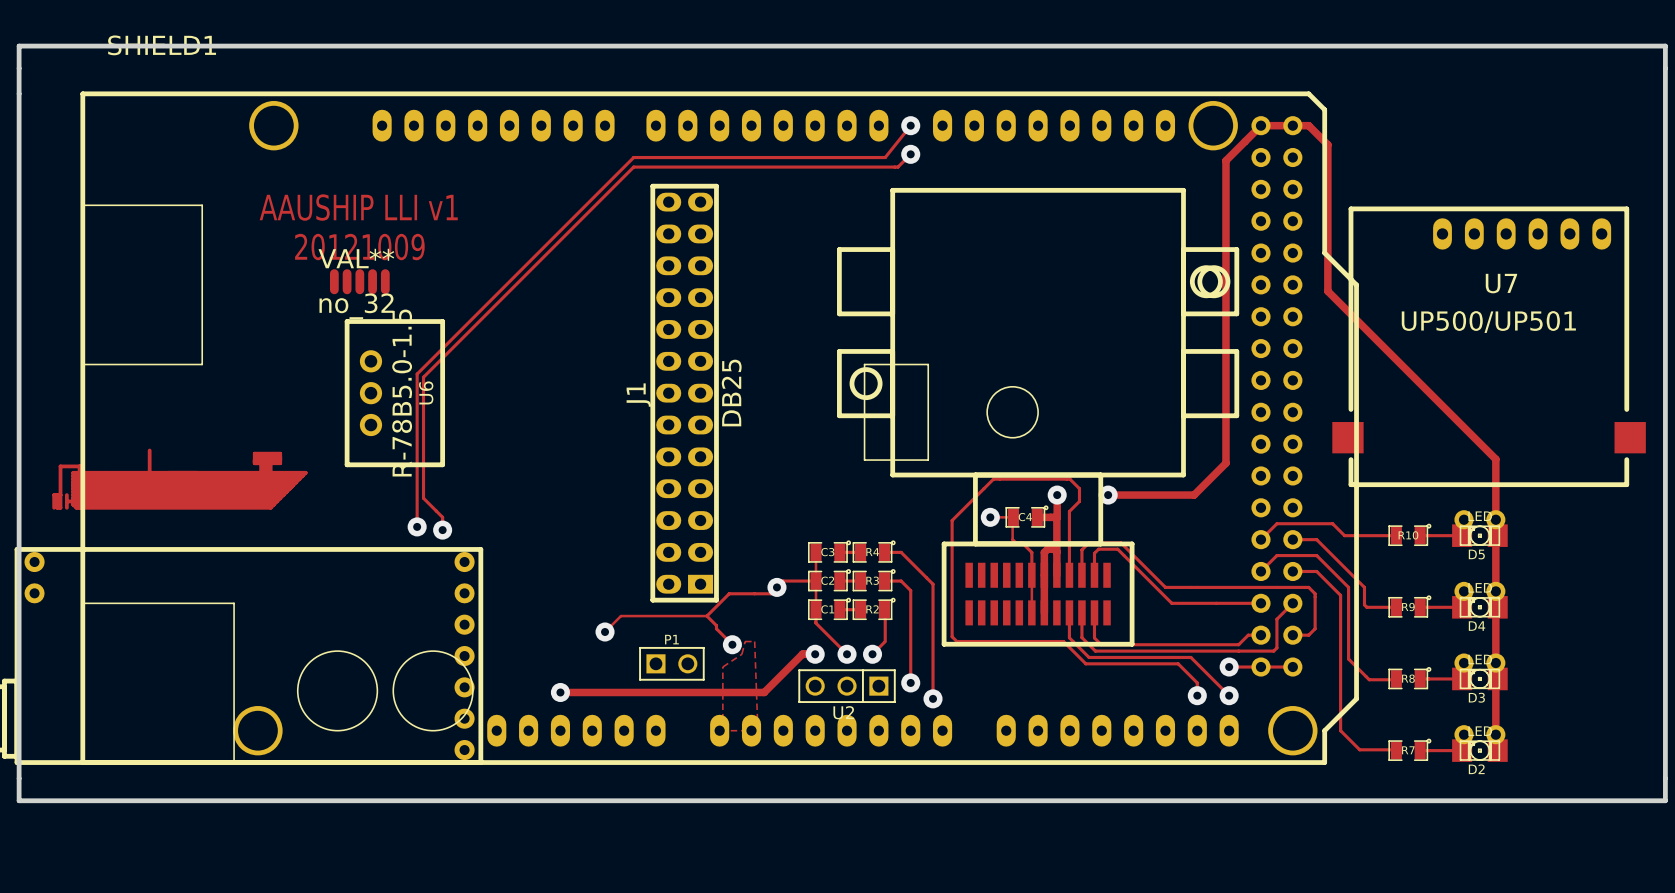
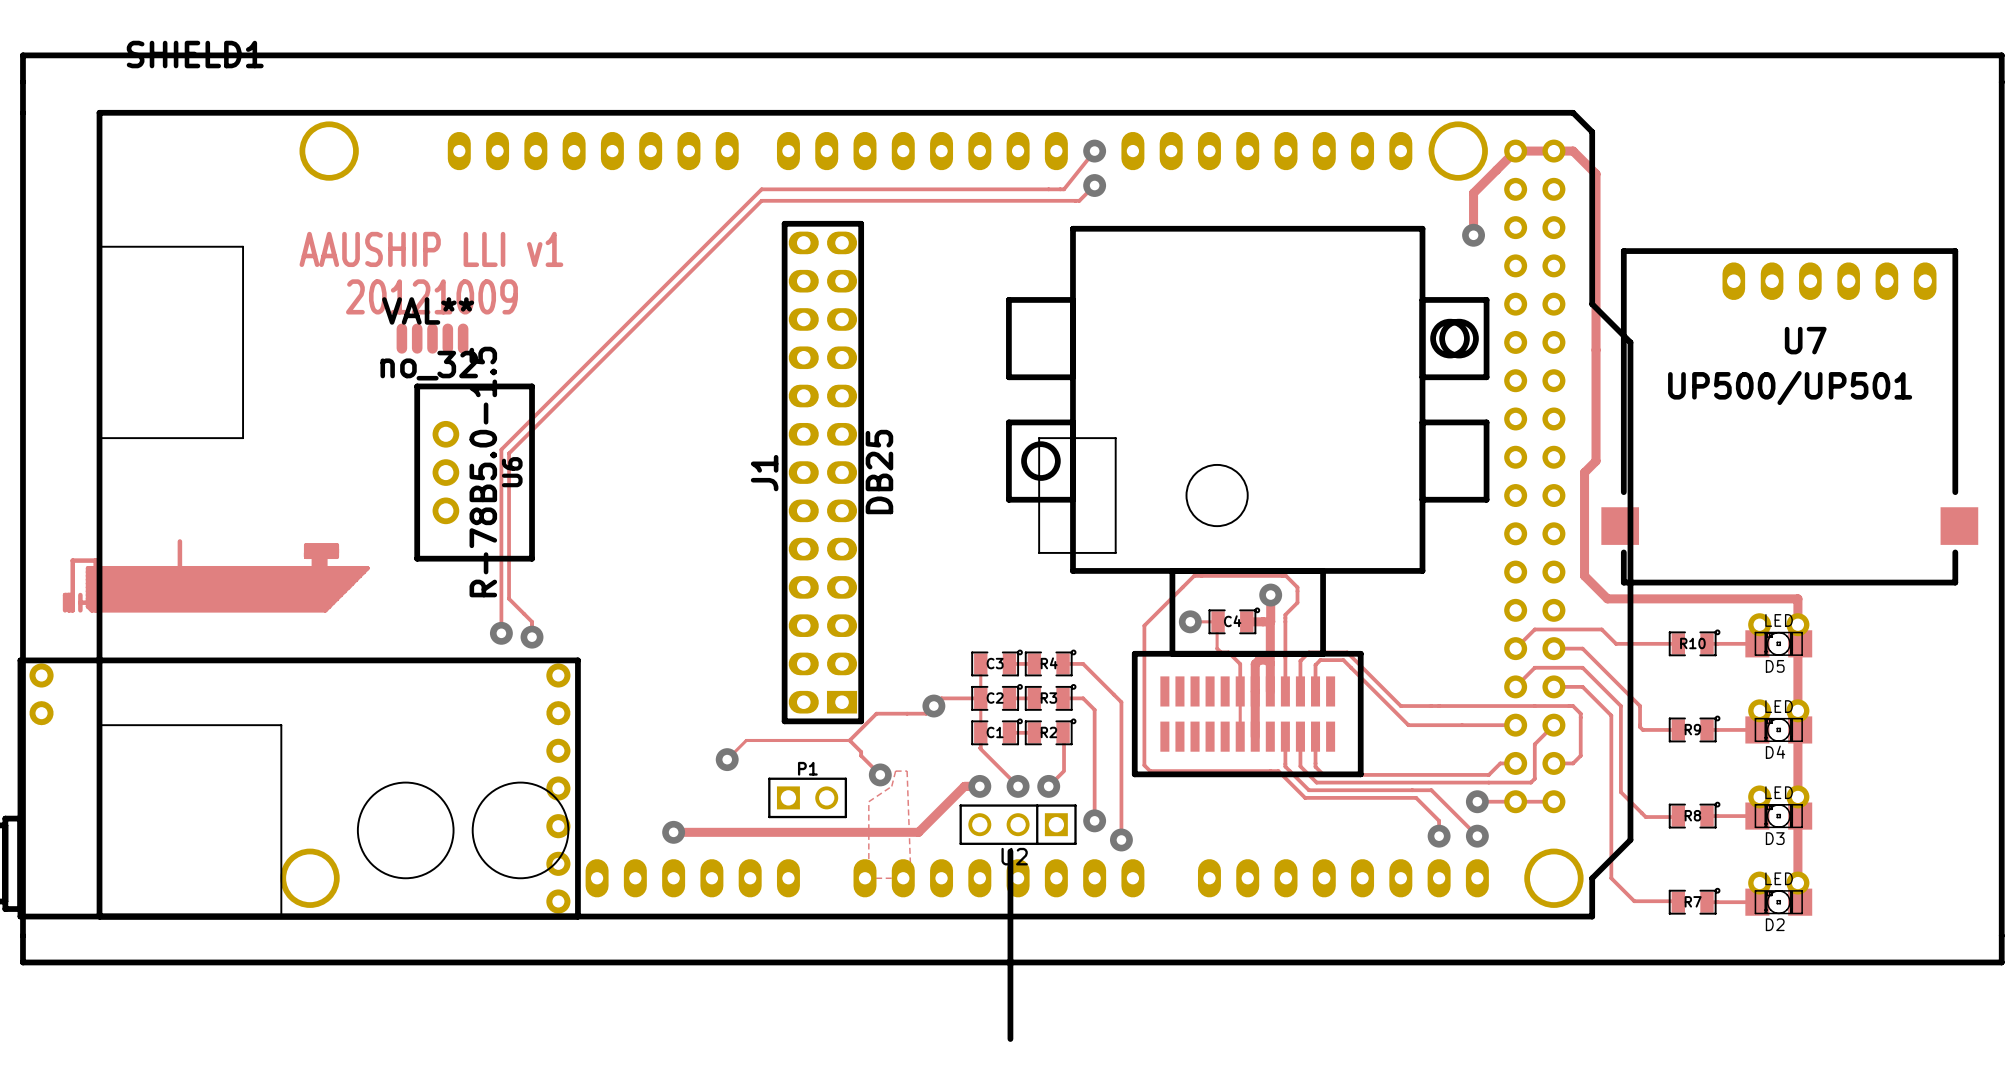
track: (1225, 195) (1225, 463) (1194, 495) (1108, 495) -> none
via: none -> (1473, 235)
track: (1327, 291) (1495, 459) (1495, 498) -> (1596, 350) (1596, 461) (1584, 472) (1584, 575) (1607, 598) (1797, 598)
via: (1108, 495) -> none
board edge: none -> (1010, 851) (1010, 1039)

